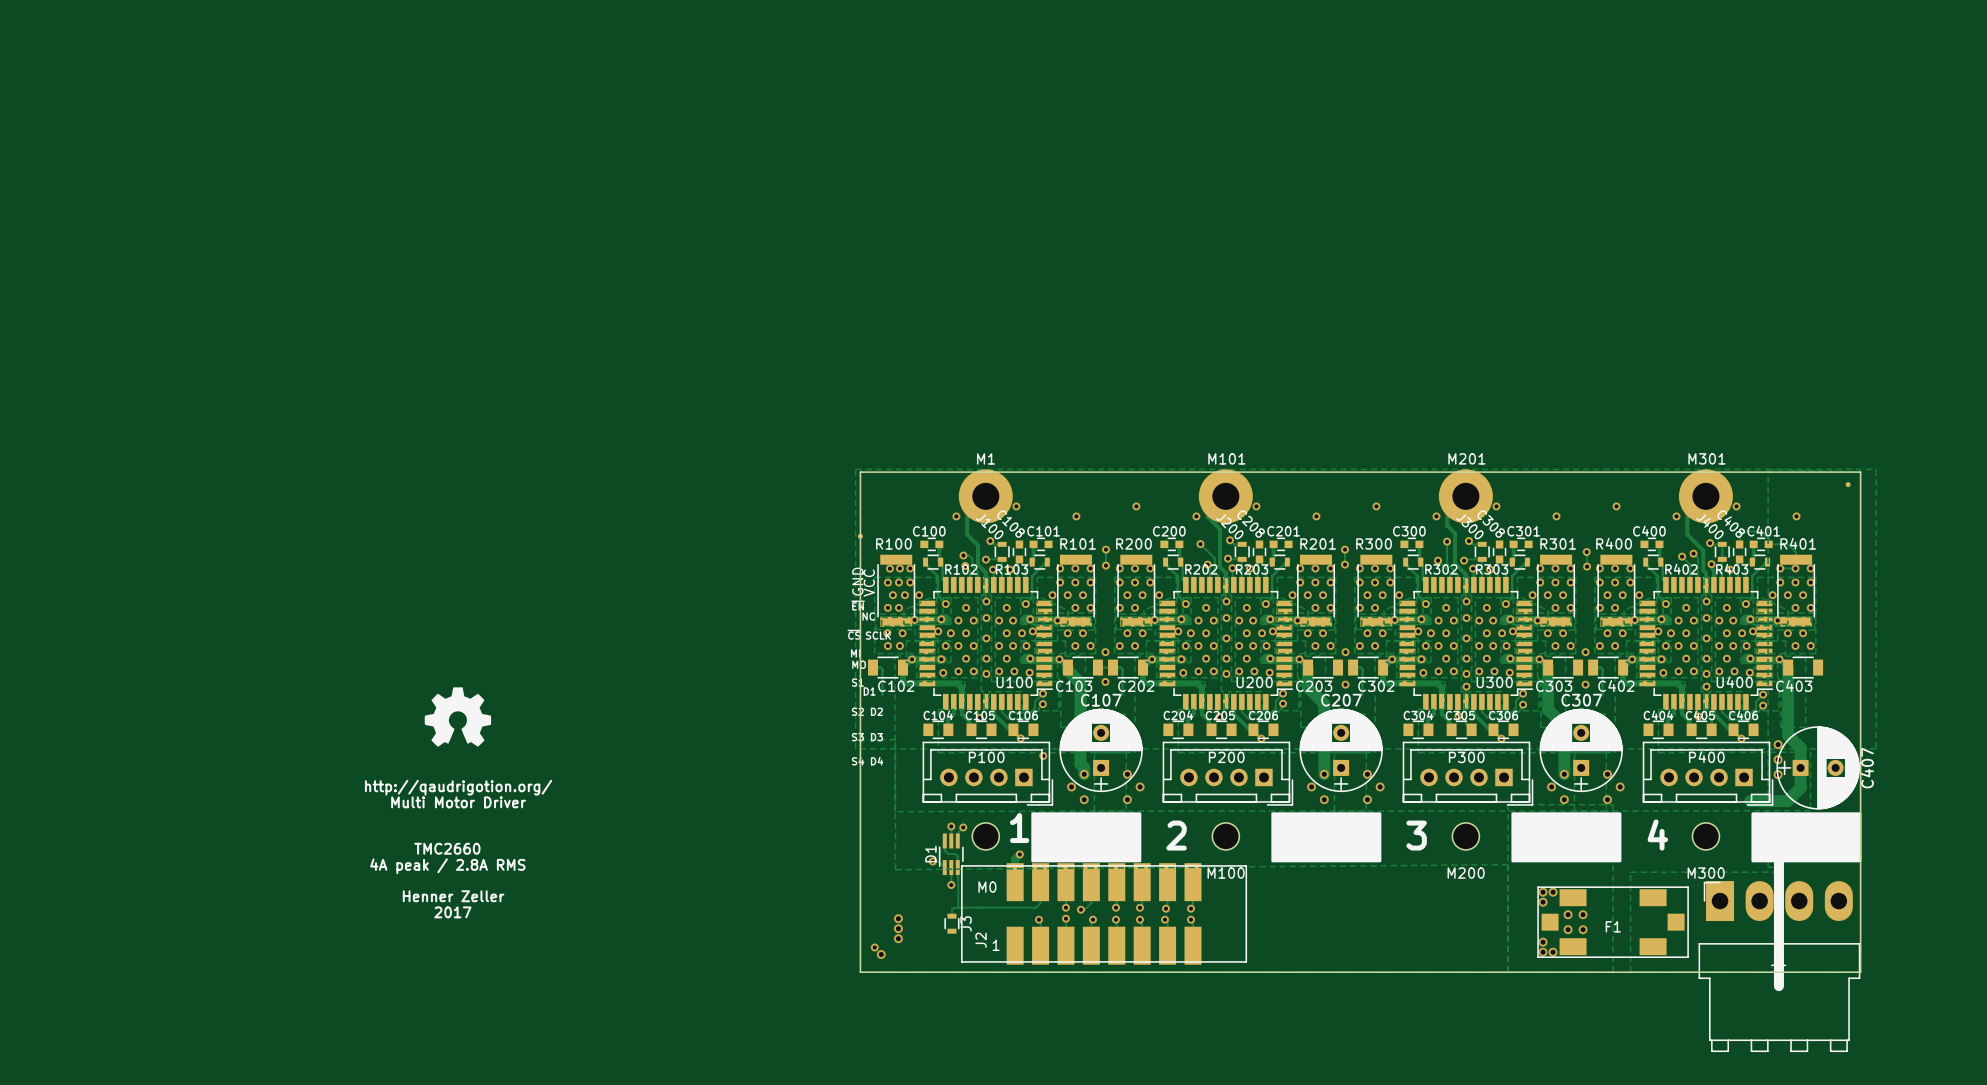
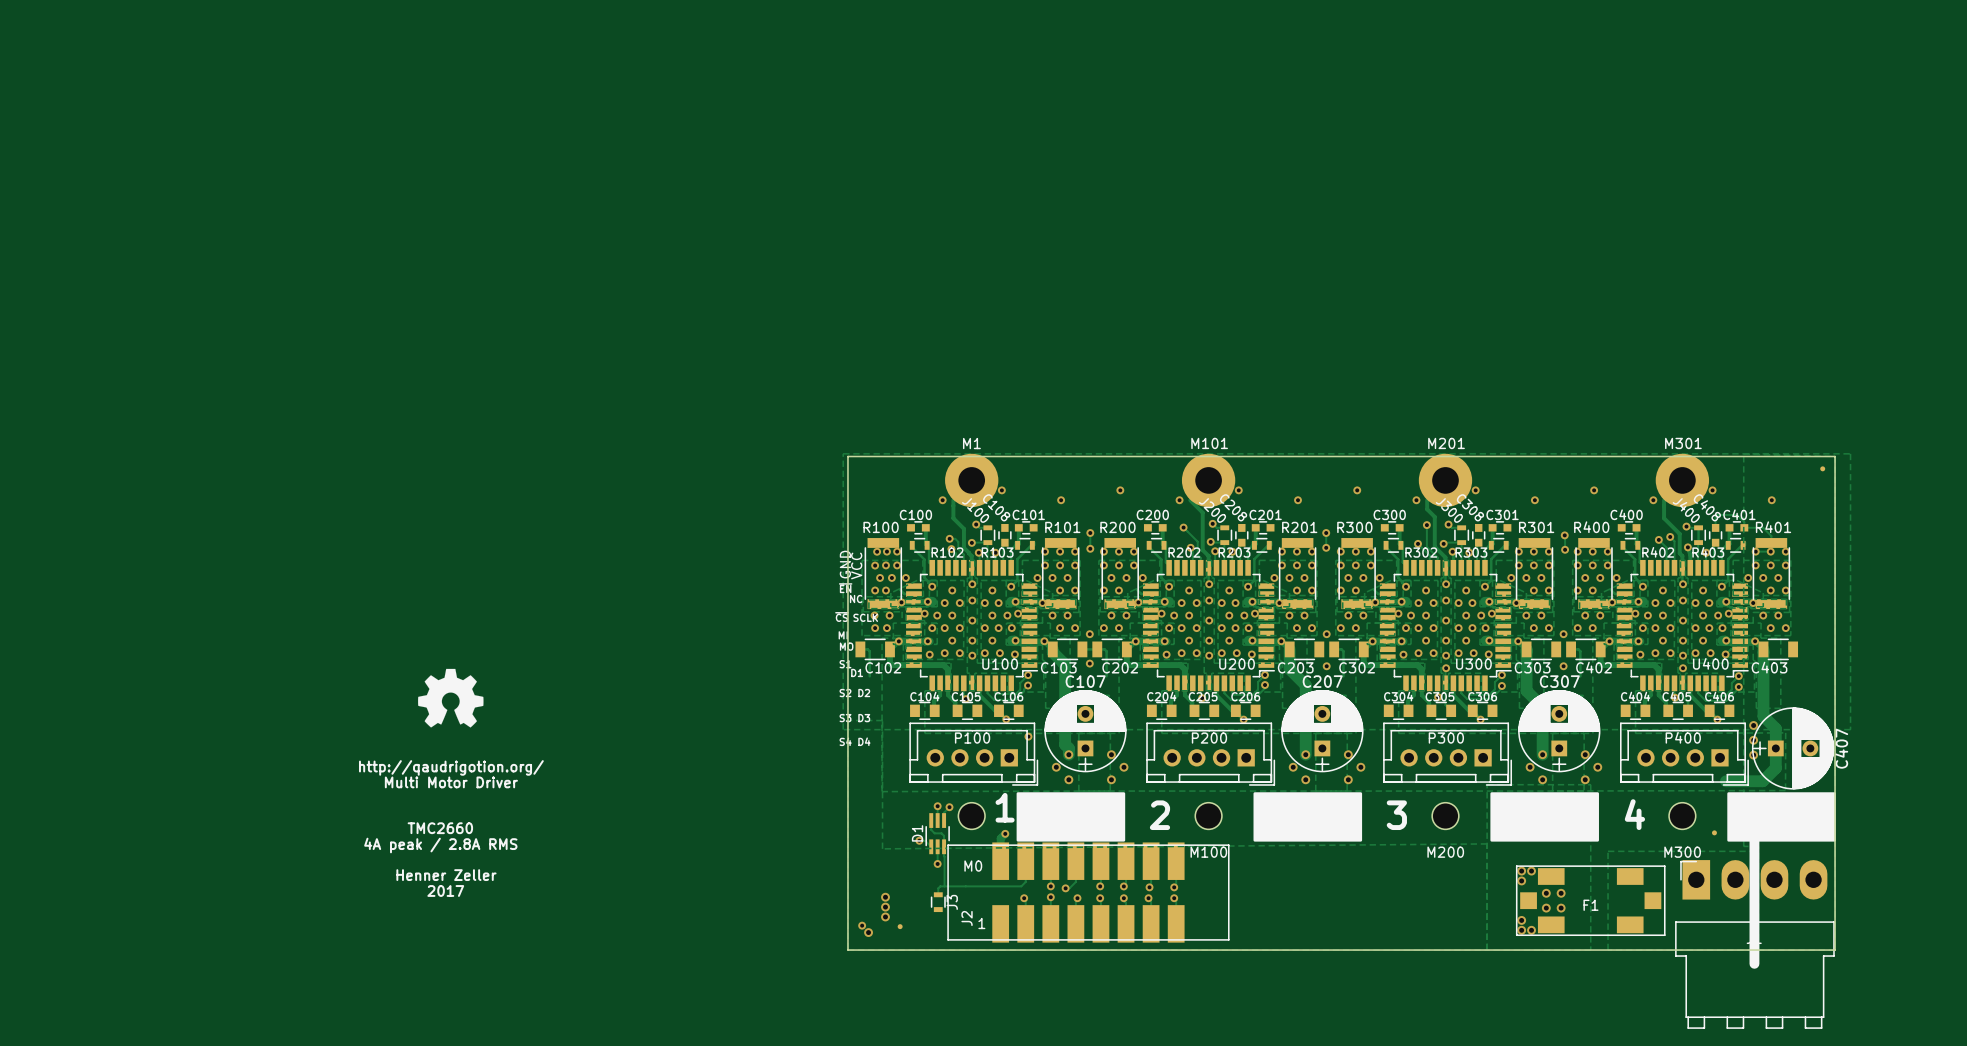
part: (860, 536) -> none
part: none -> (1714, 832)
part: none -> (900, 926)

